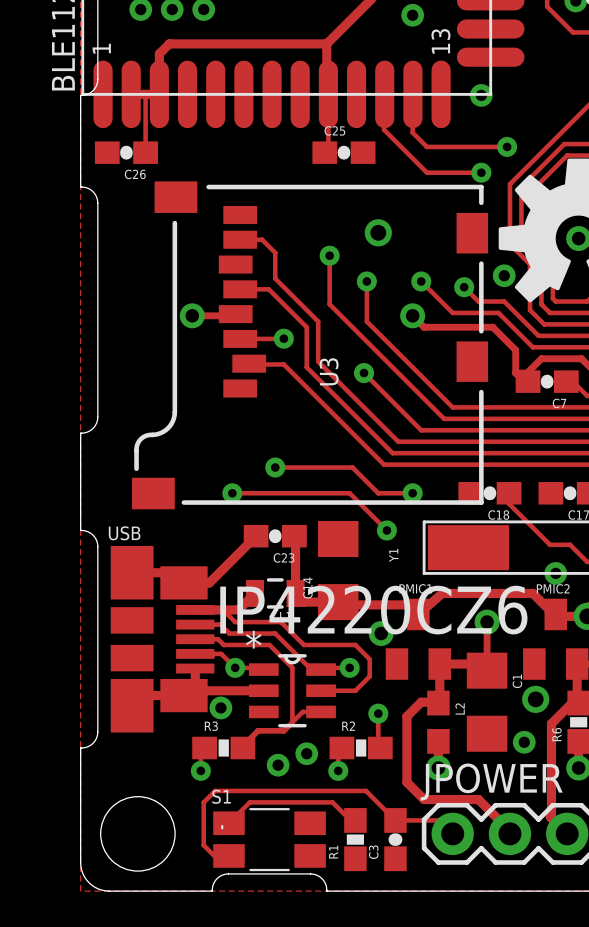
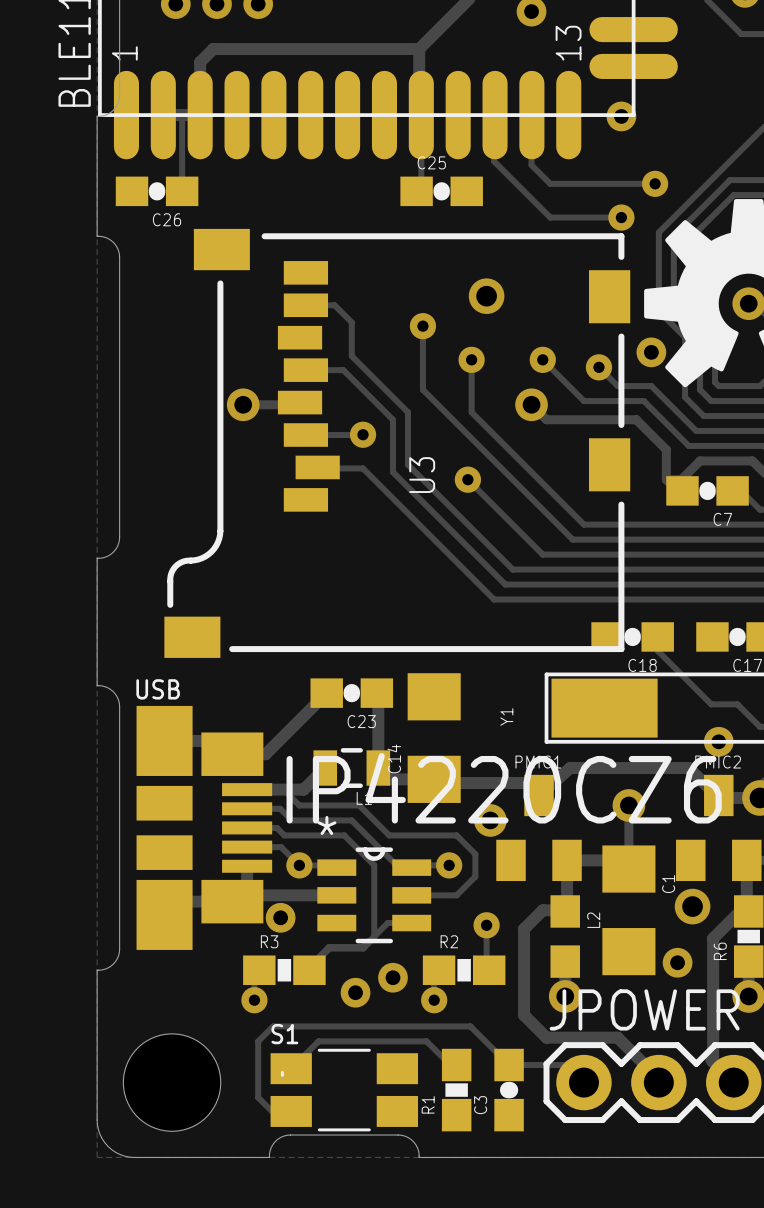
track: (275, 467) (352, 467) (378, 493) (412, 493) -> none
via: (275, 467) -> none
track: (232, 493) (349, 493) (386, 530) -> none
via: (232, 493) -> none
via: (412, 493) -> none
via: (386, 530) -> none

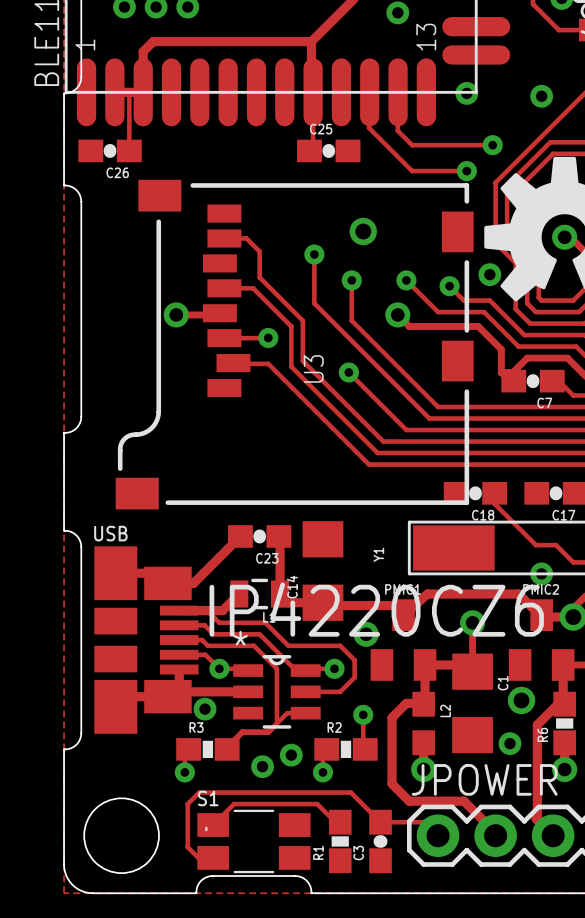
via: none -> (541, 96)

